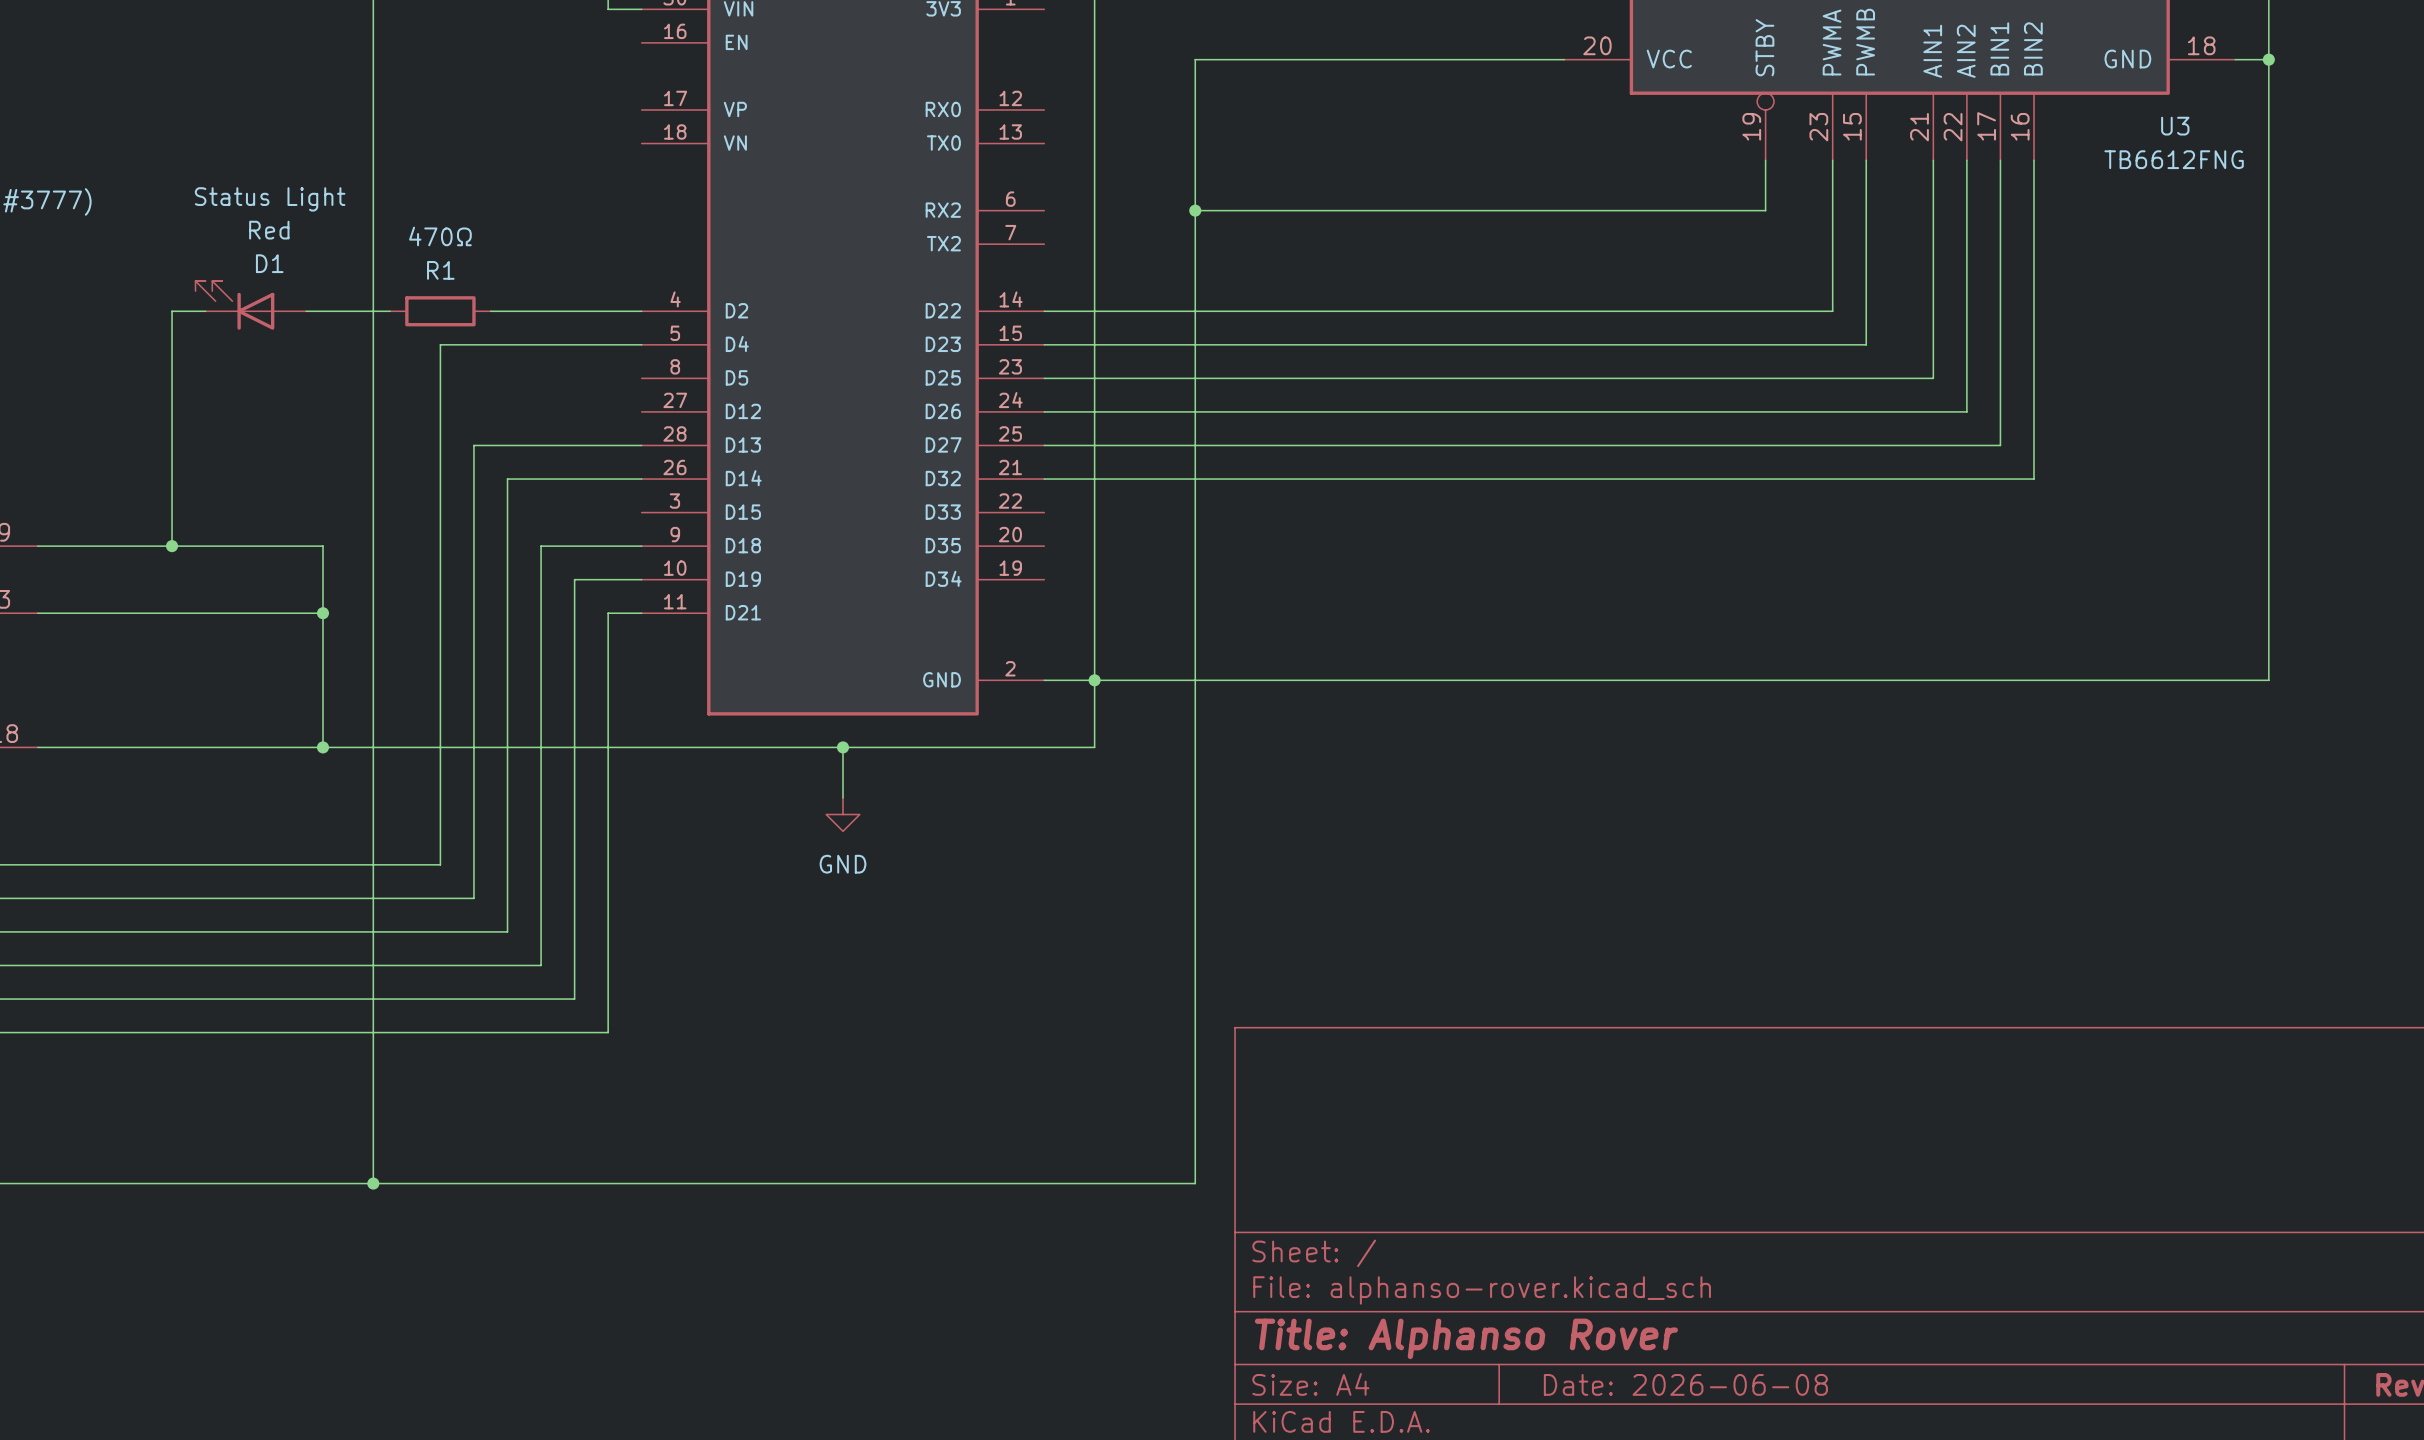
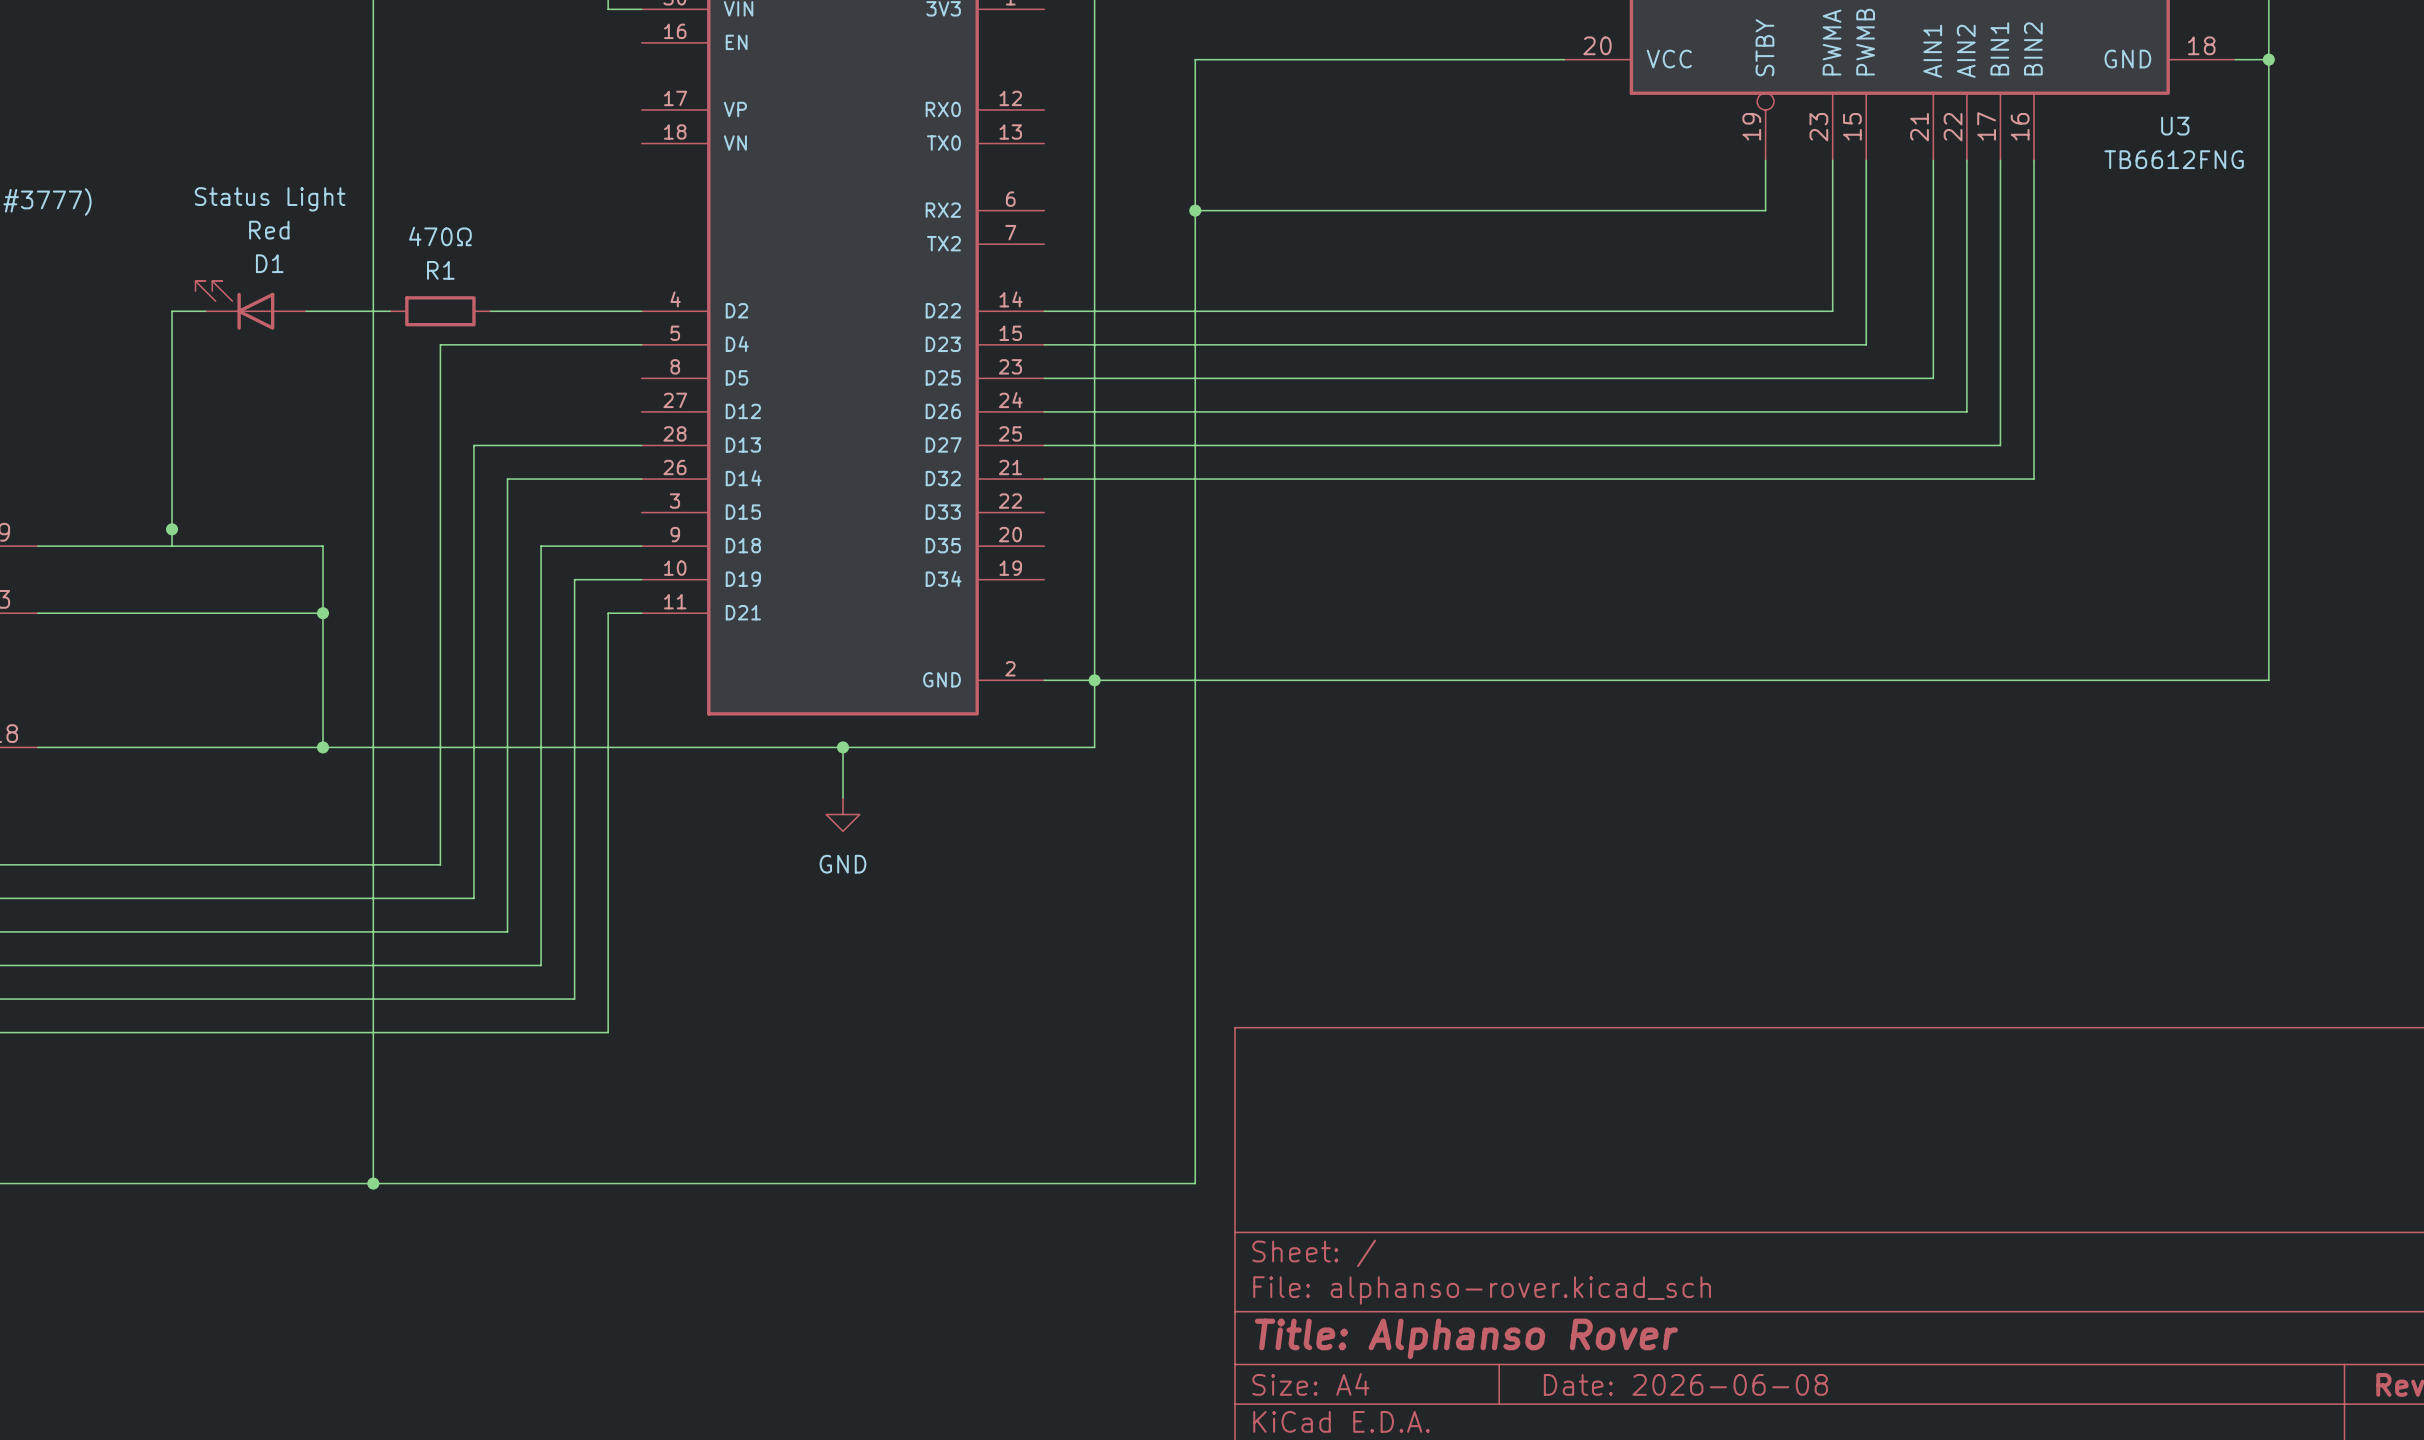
junction position: (172, 546) -> (172, 529)

